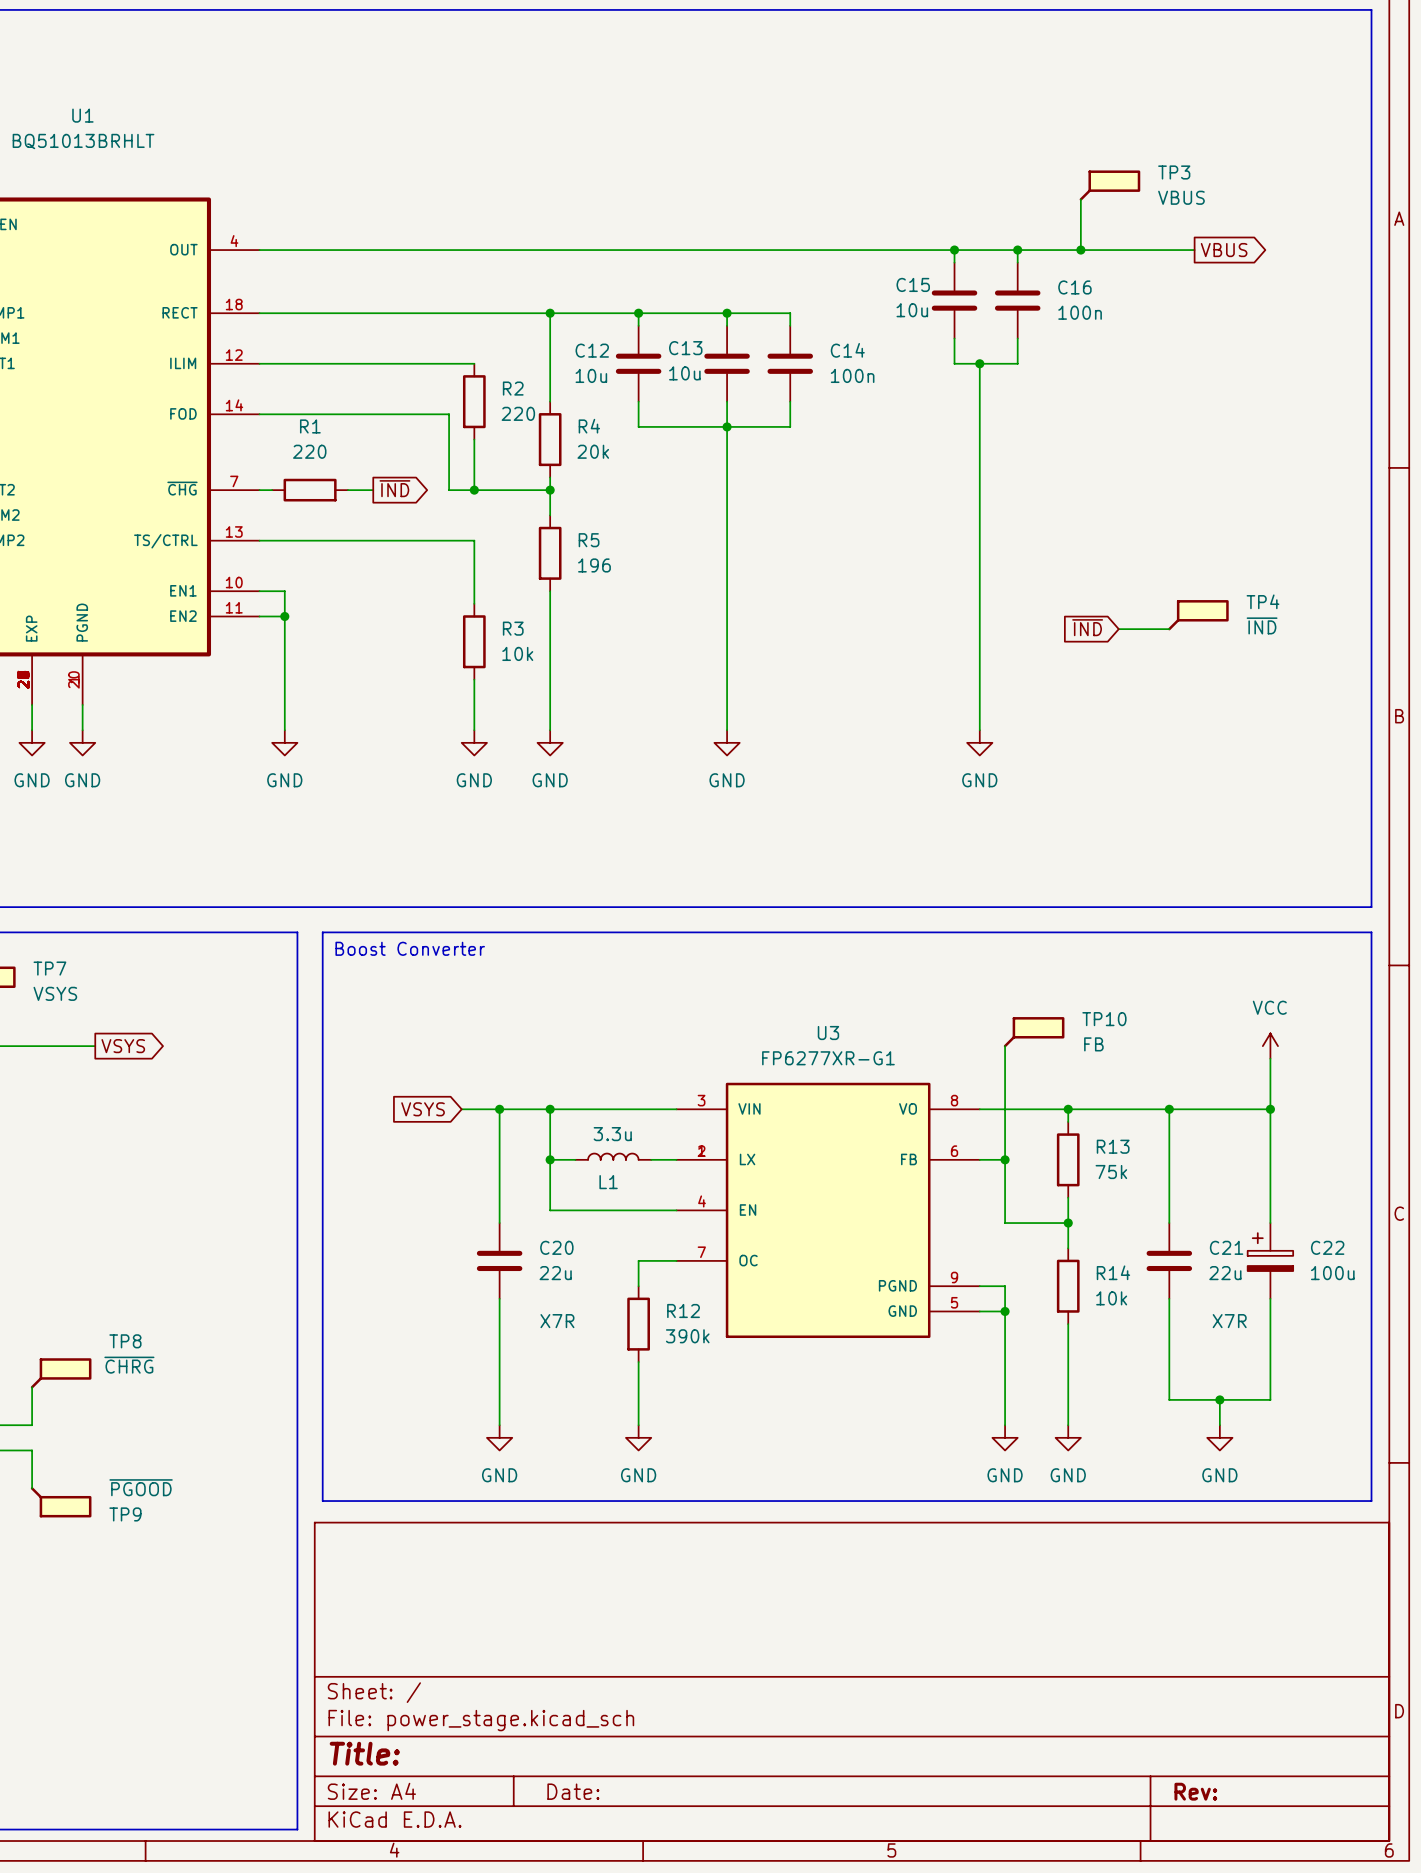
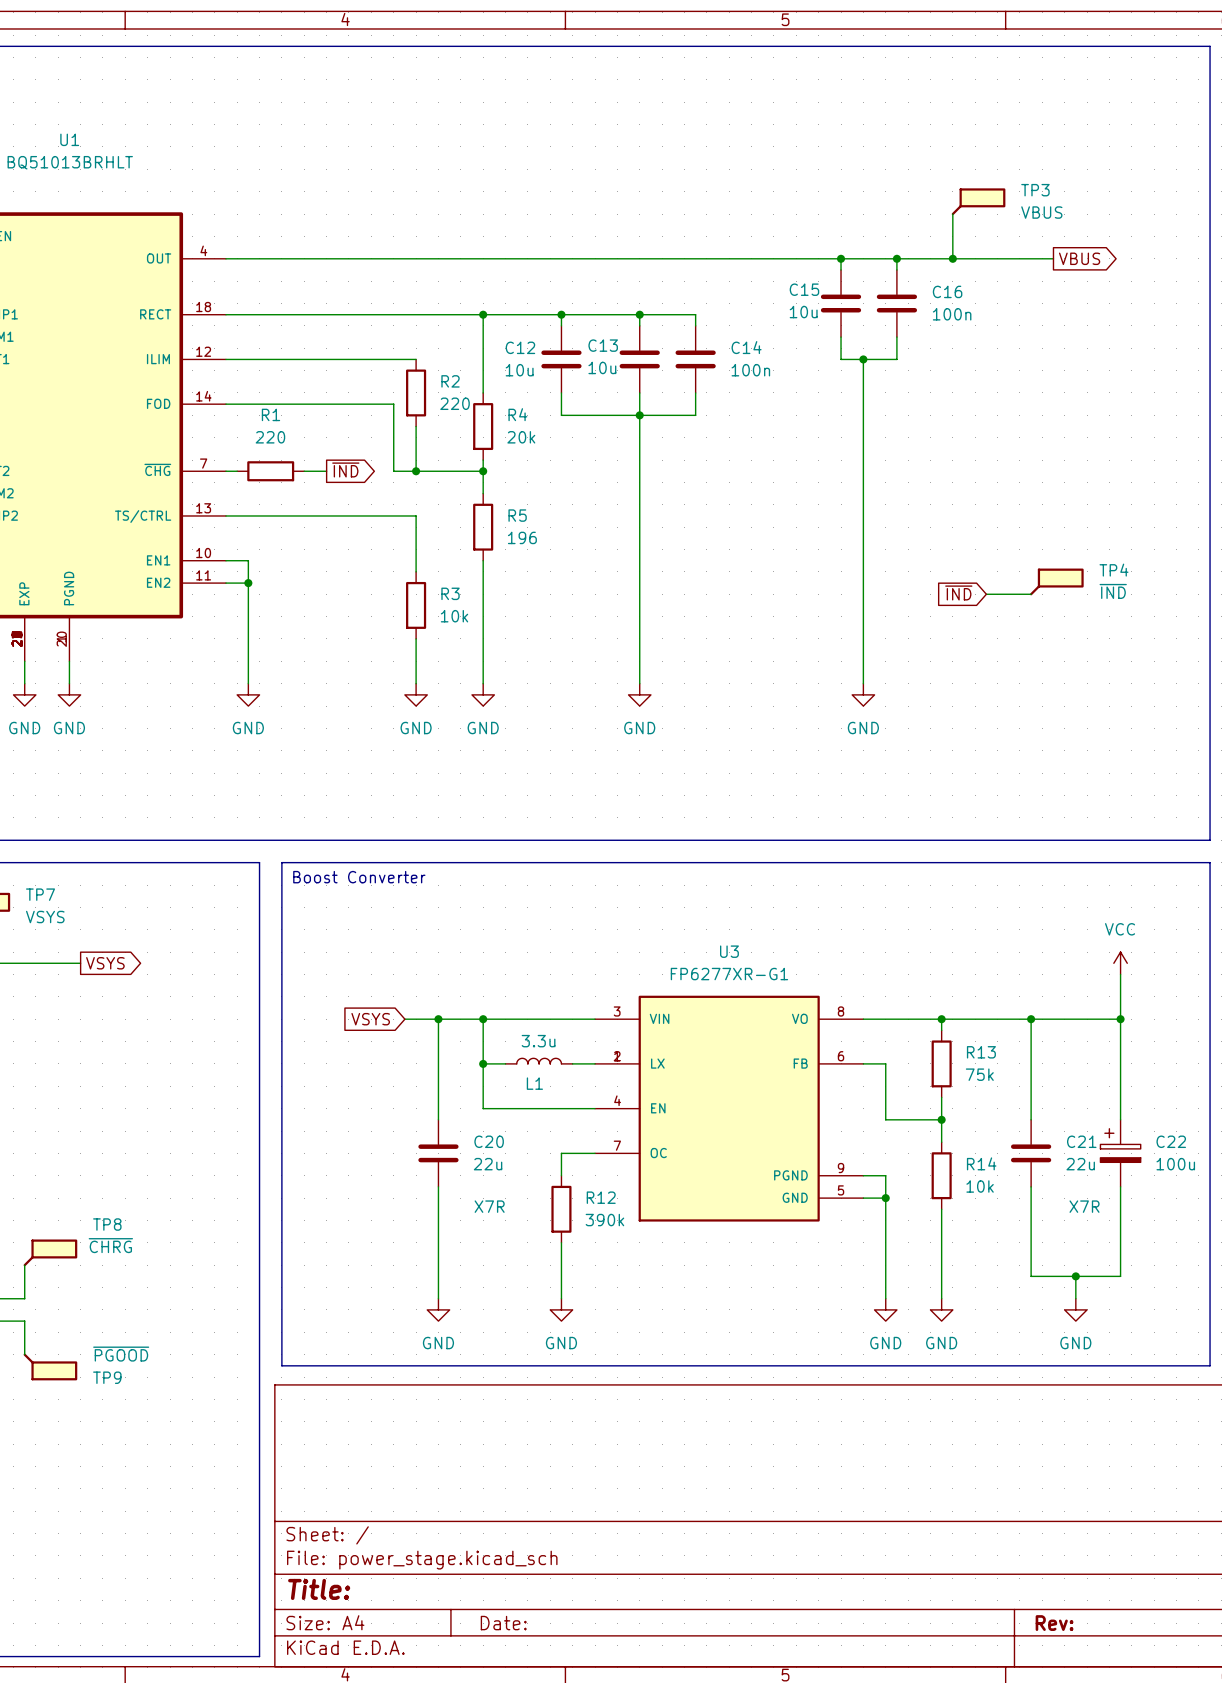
TP10: FB (1034, 1032) -> none
wire: (1005, 1046) (1005, 1159) -> none
junction: (1005, 1159) -> none

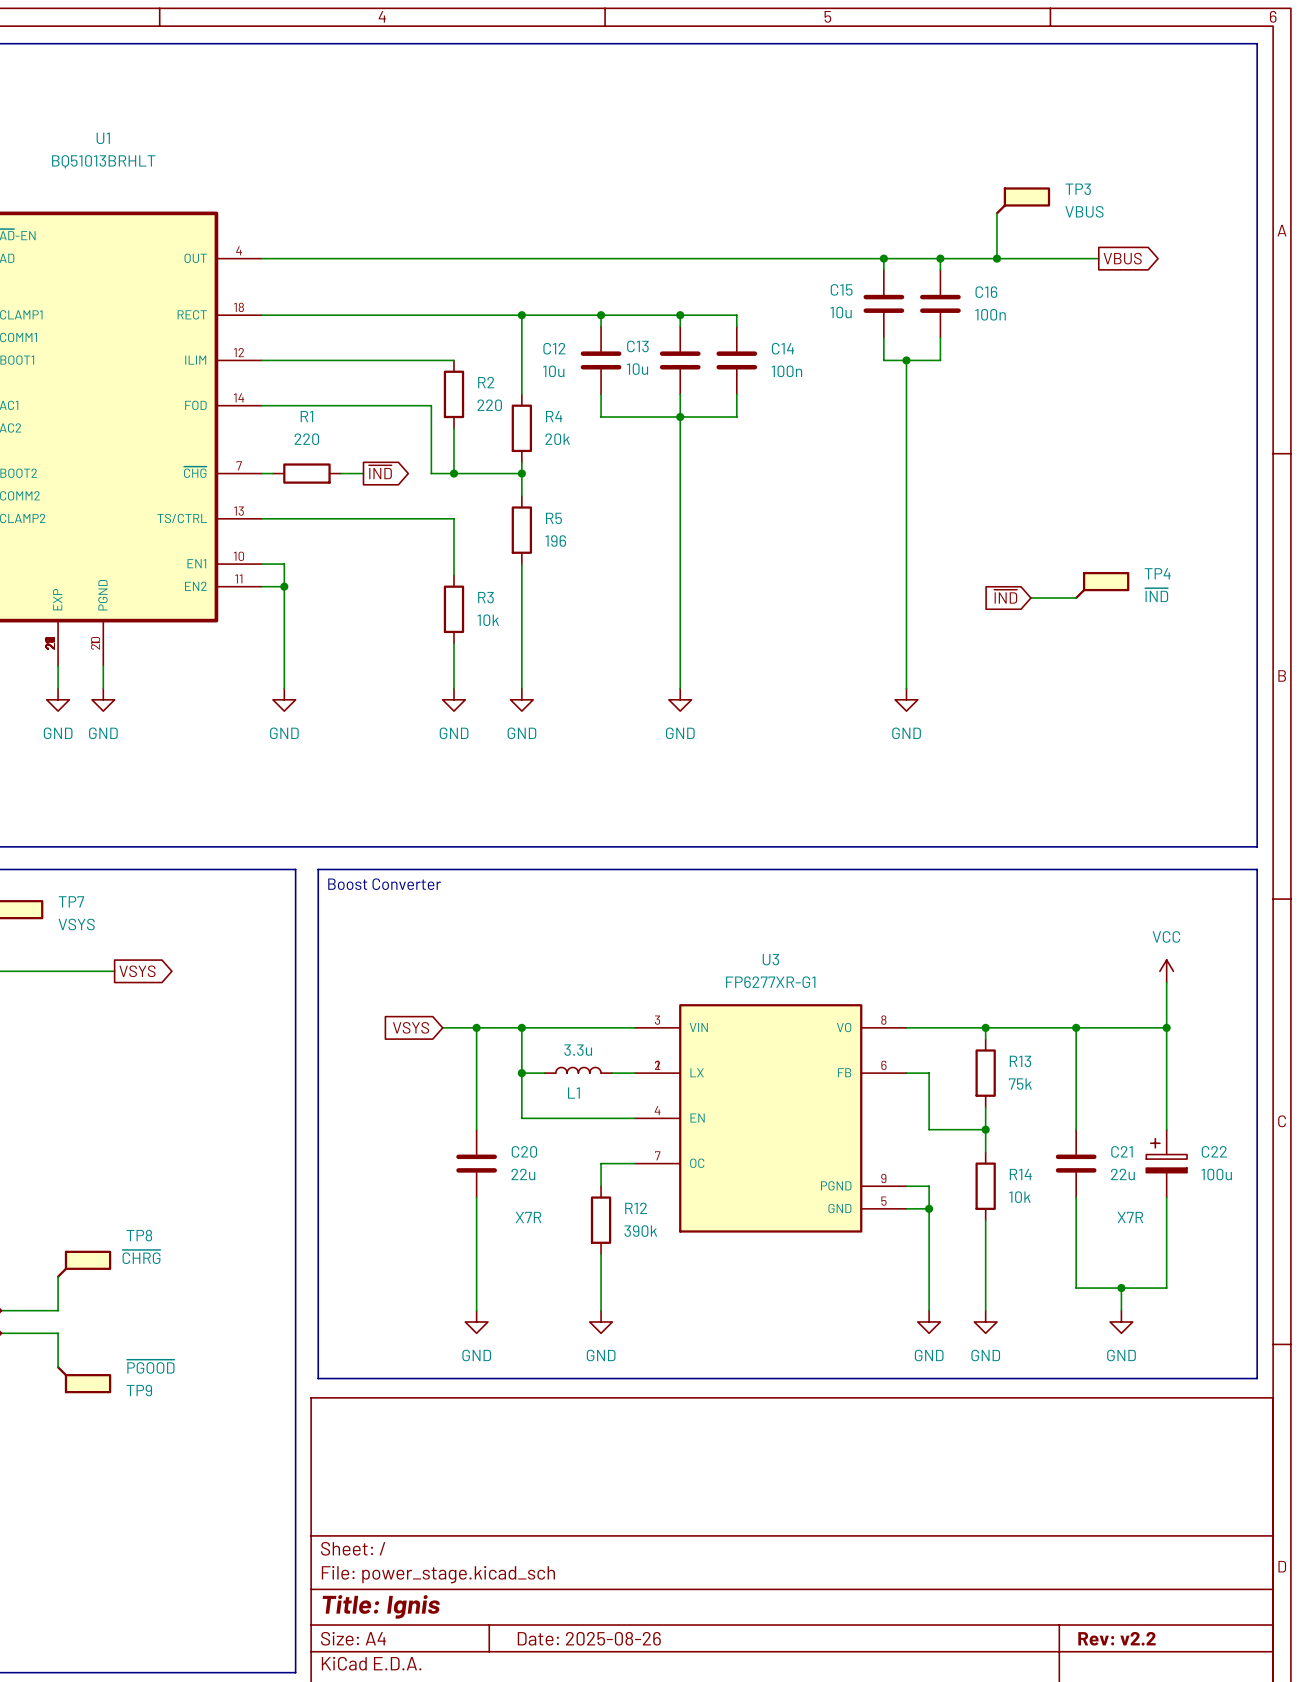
title block: Title: (319, 1589) -> Title: Ignis (381, 1606)
title block: Date: (503, 1623) -> Date: 2025-08-26 (589, 1638)
title block: Rev: (1054, 1623) -> Rev: v2.2 (1116, 1638)

